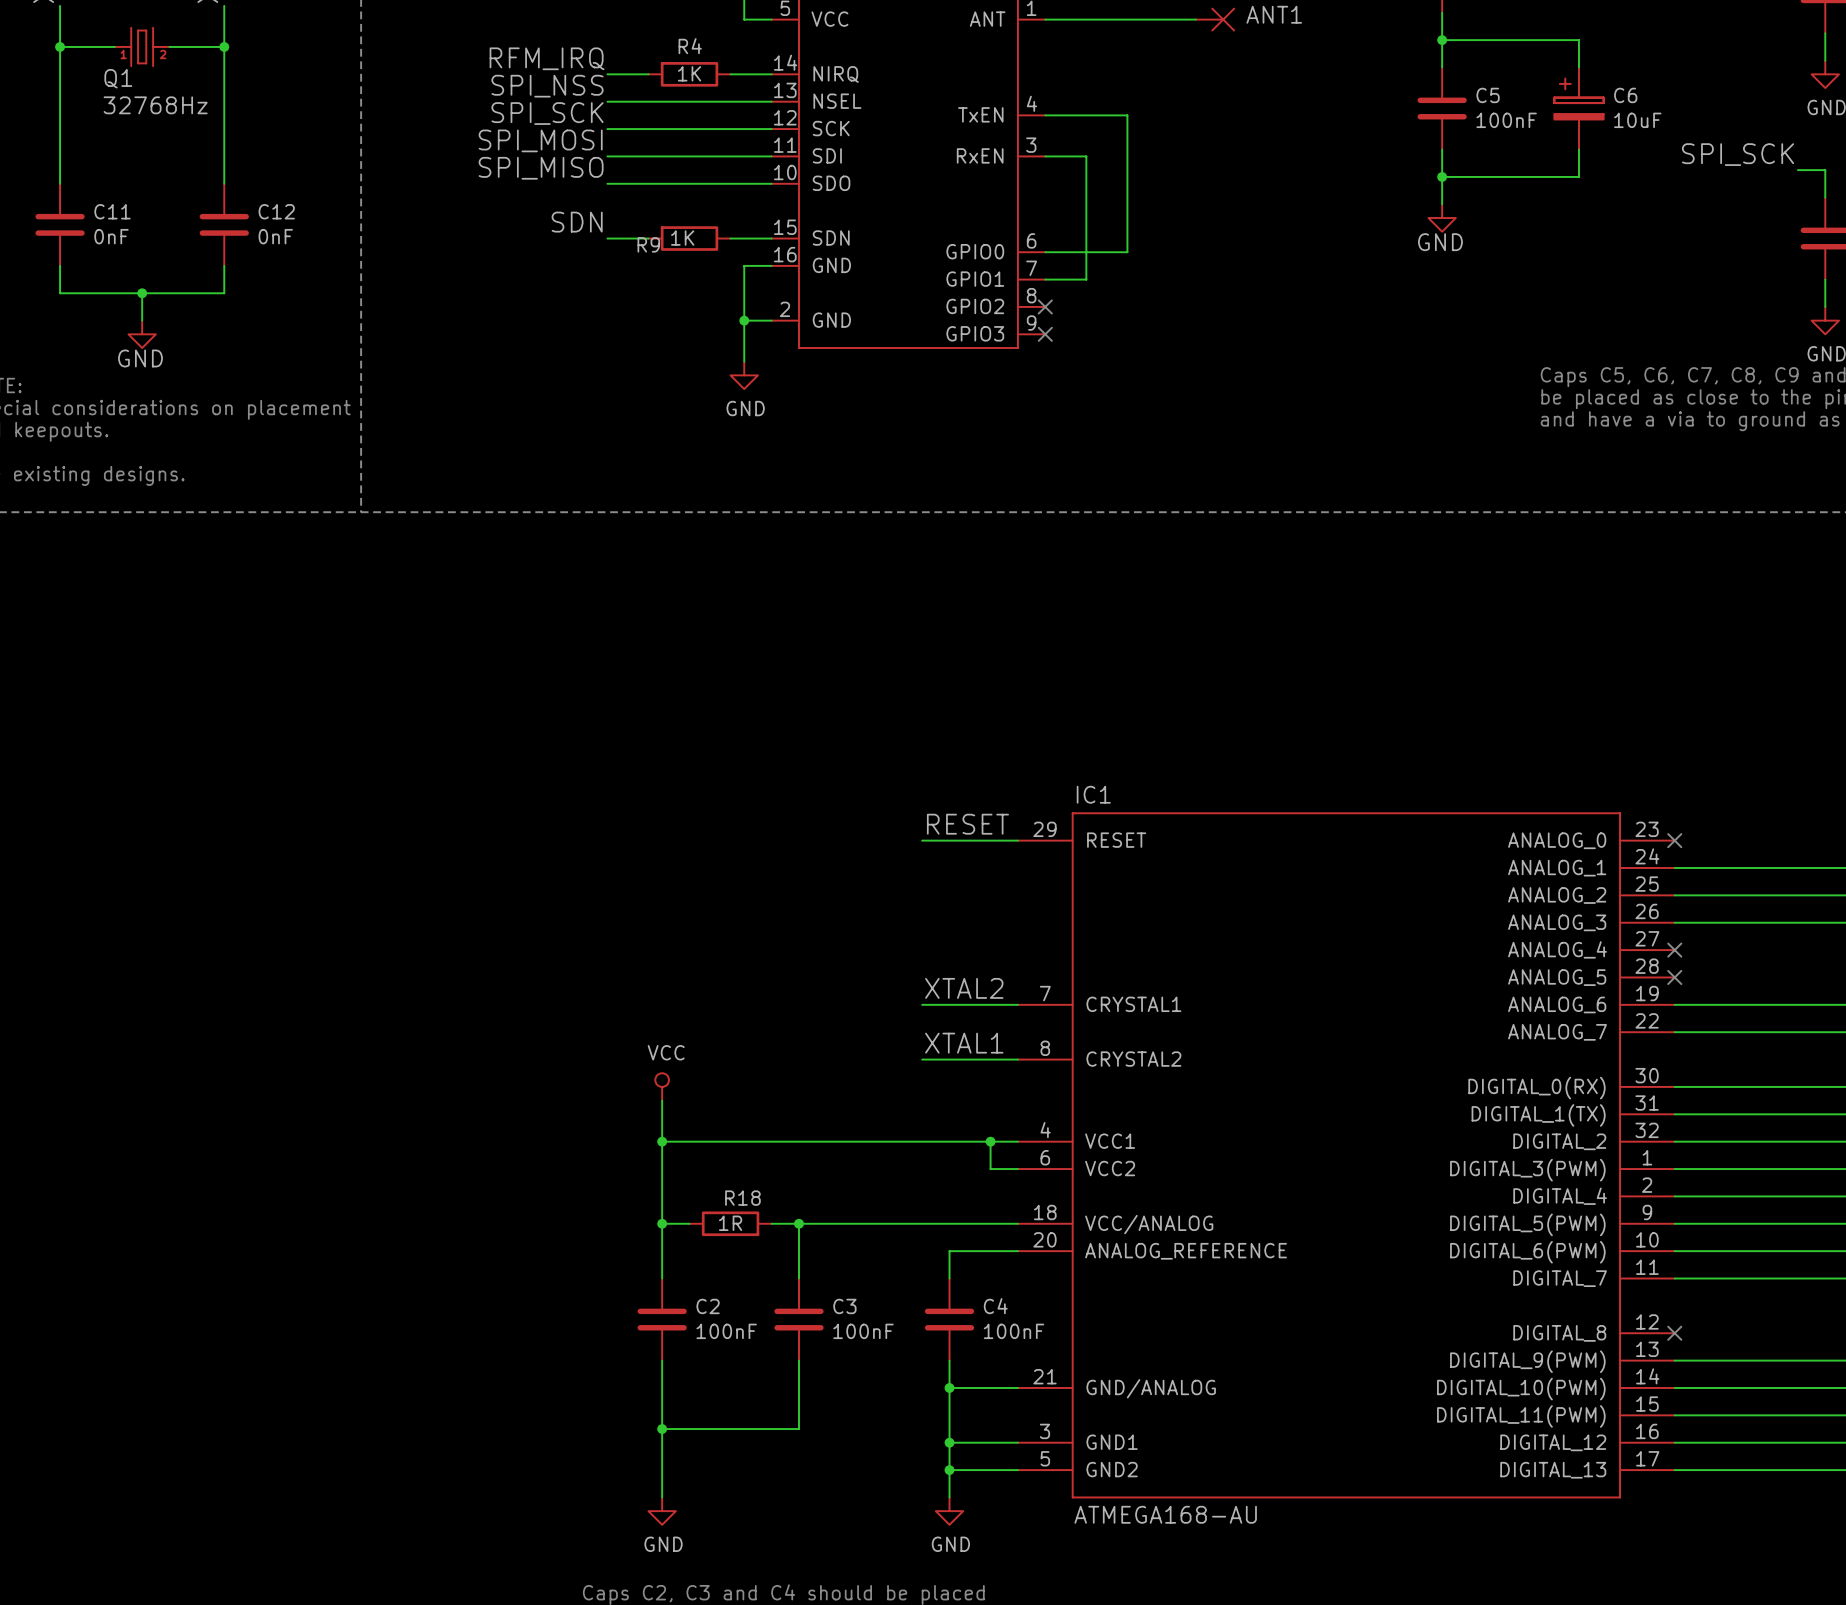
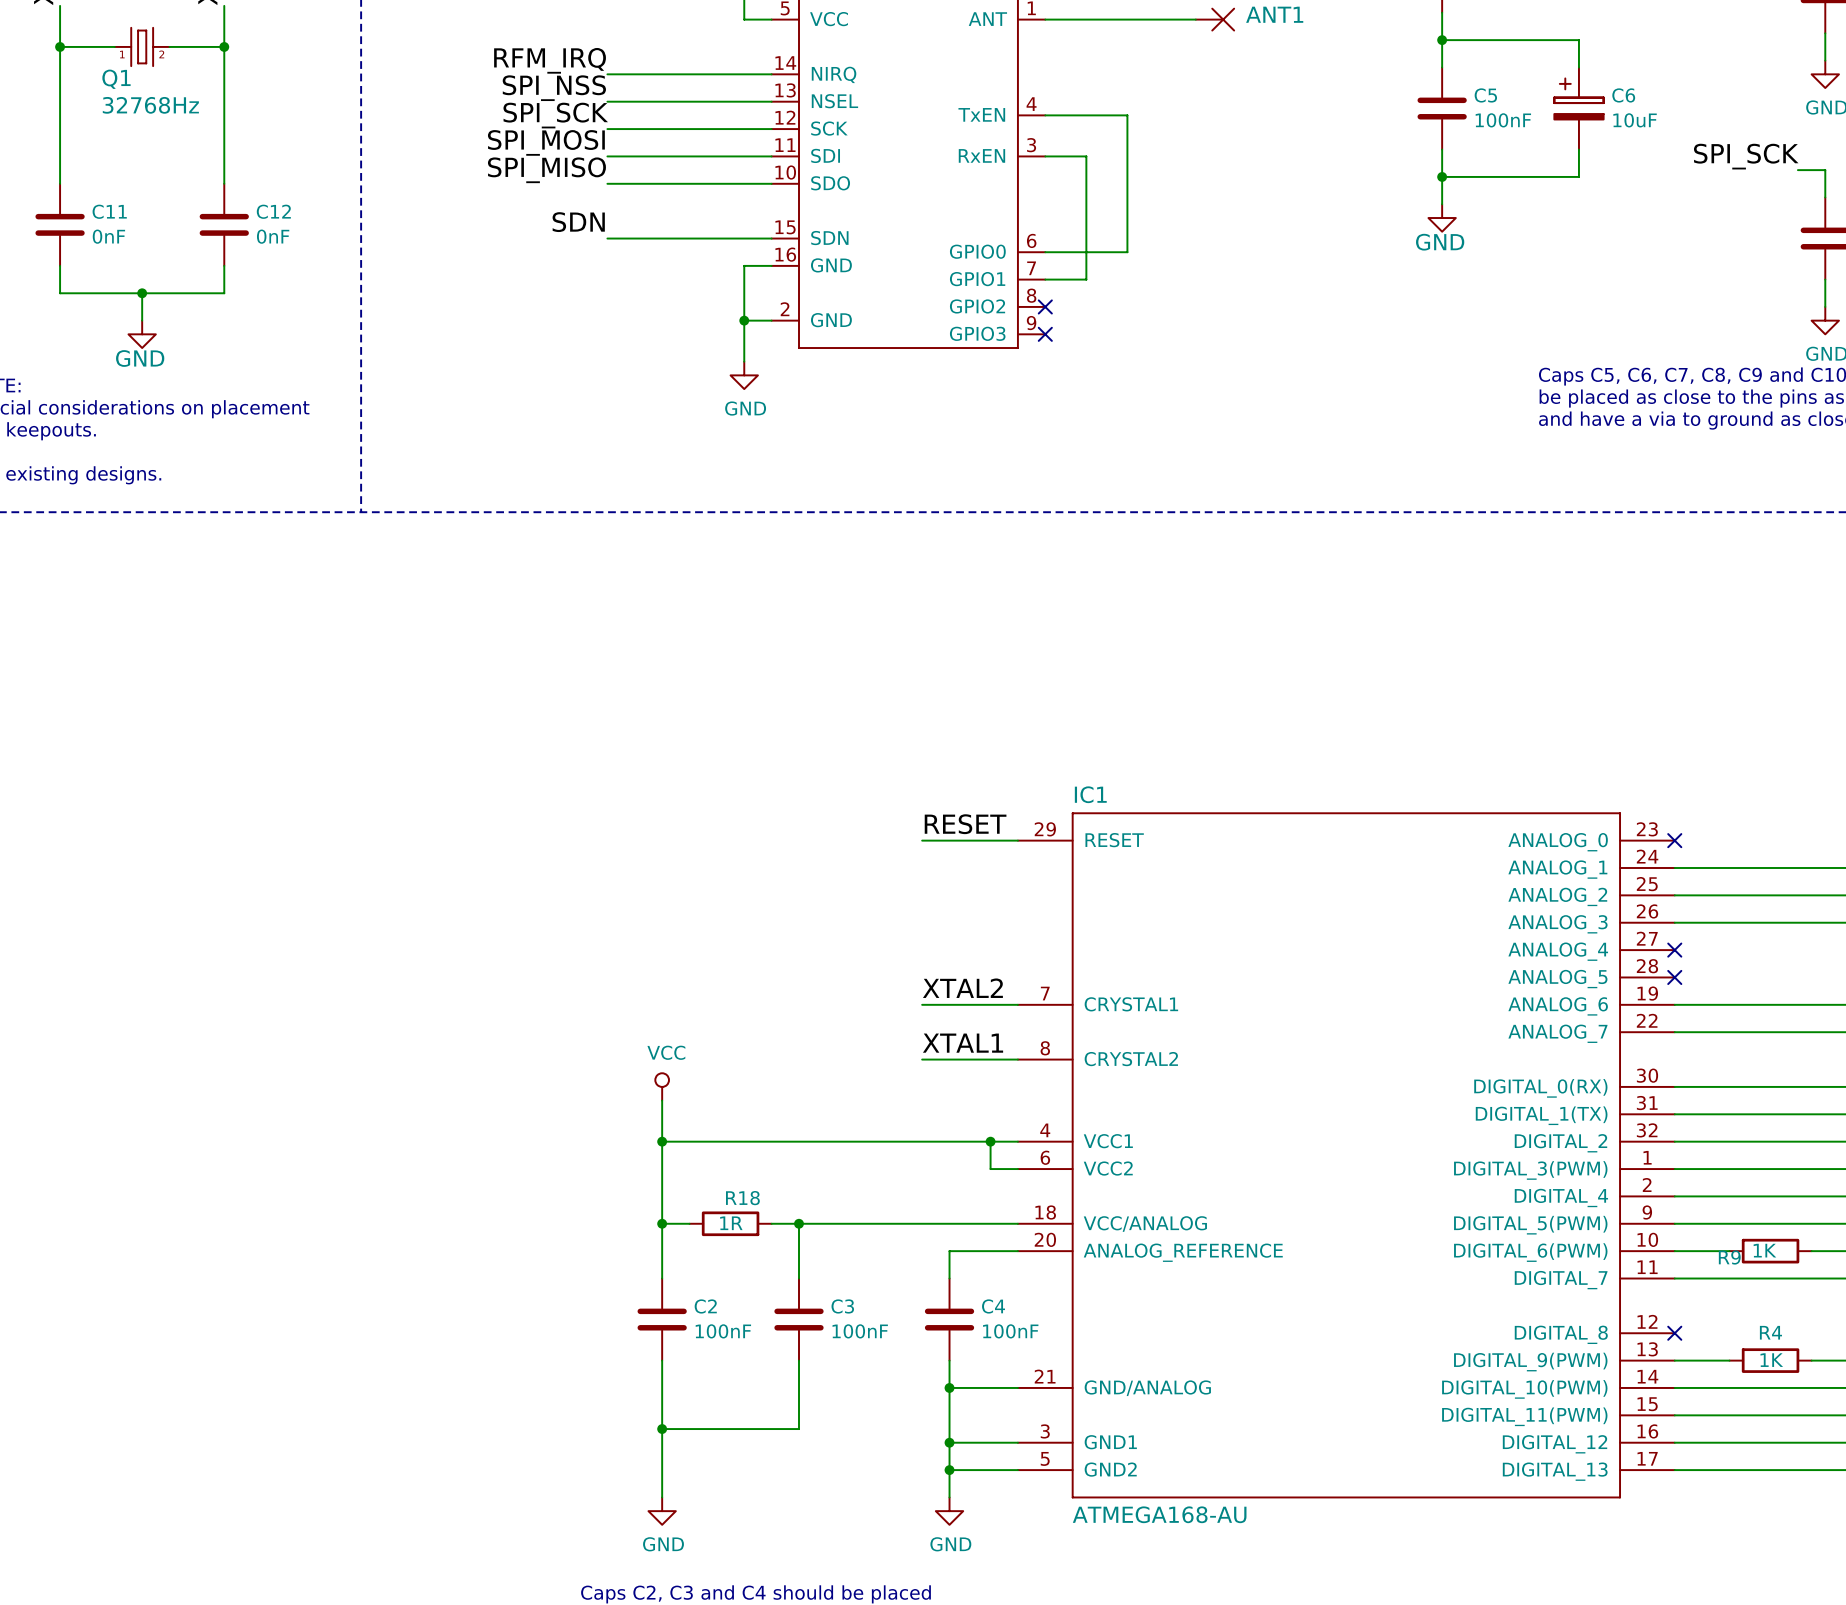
wire: none -> (648, 74) (730, 74)
R4 position: (689, 74) -> (1770, 1360)
wire: none -> (648, 238) (730, 238)
R9 position: (689, 238) -> (1770, 1251)
wire: (1729, 1251) (1811, 1251) -> none
wire: (1729, 1360) (1811, 1360) -> none

